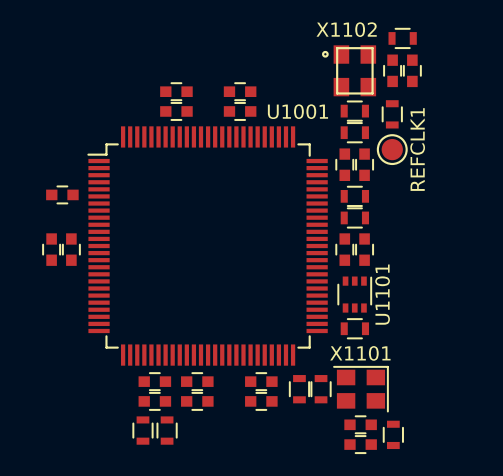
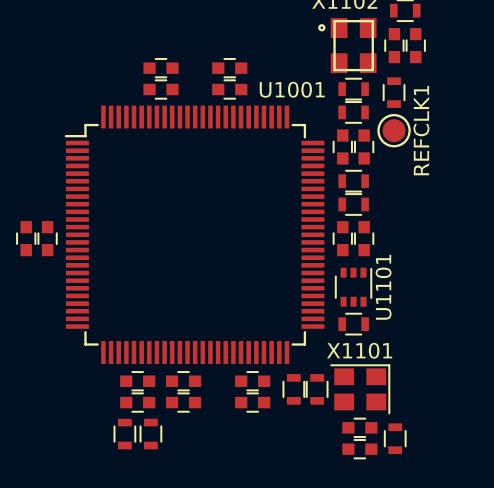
part: (62, 194) -> none

